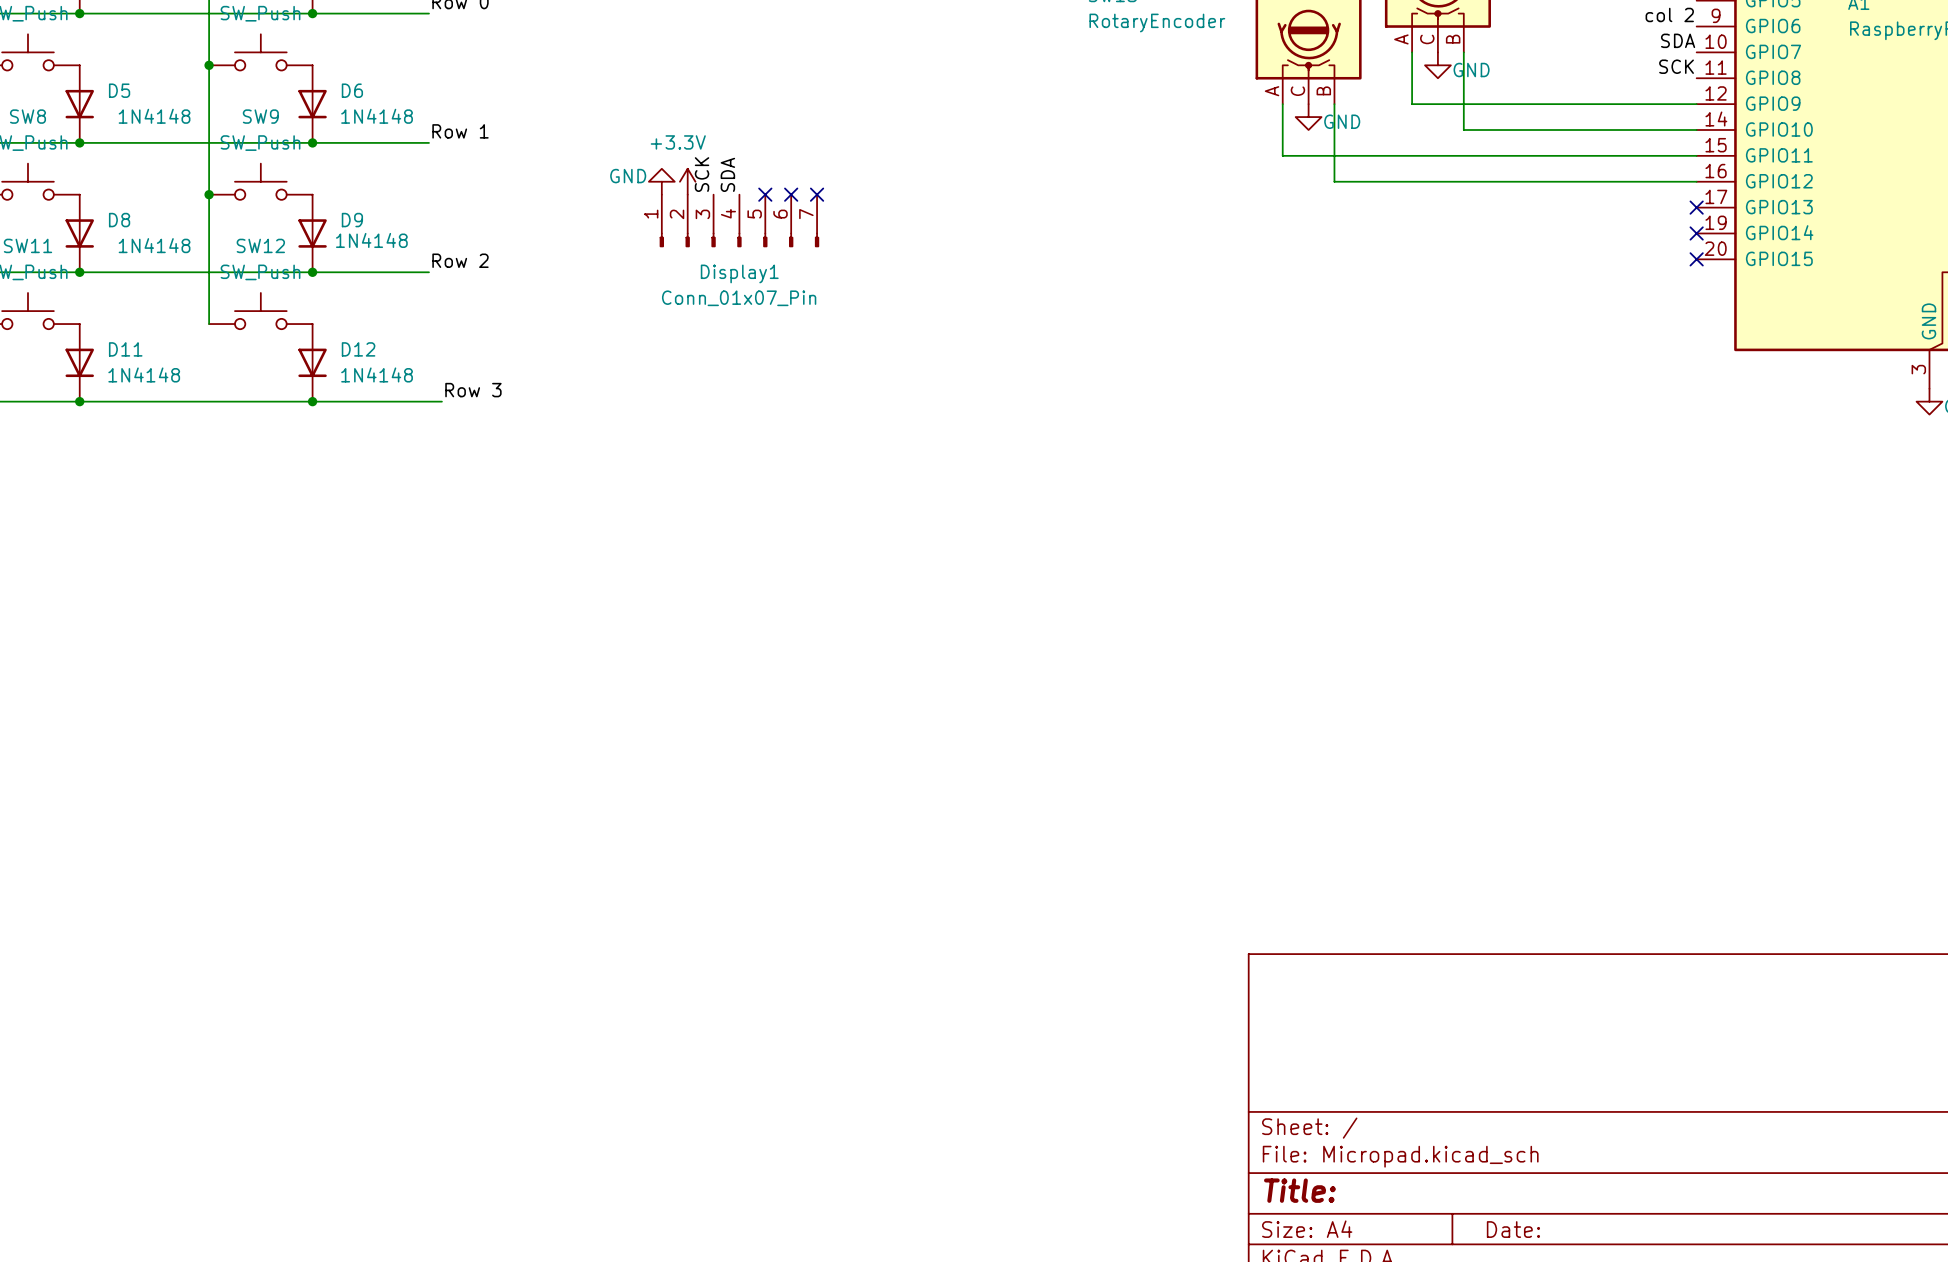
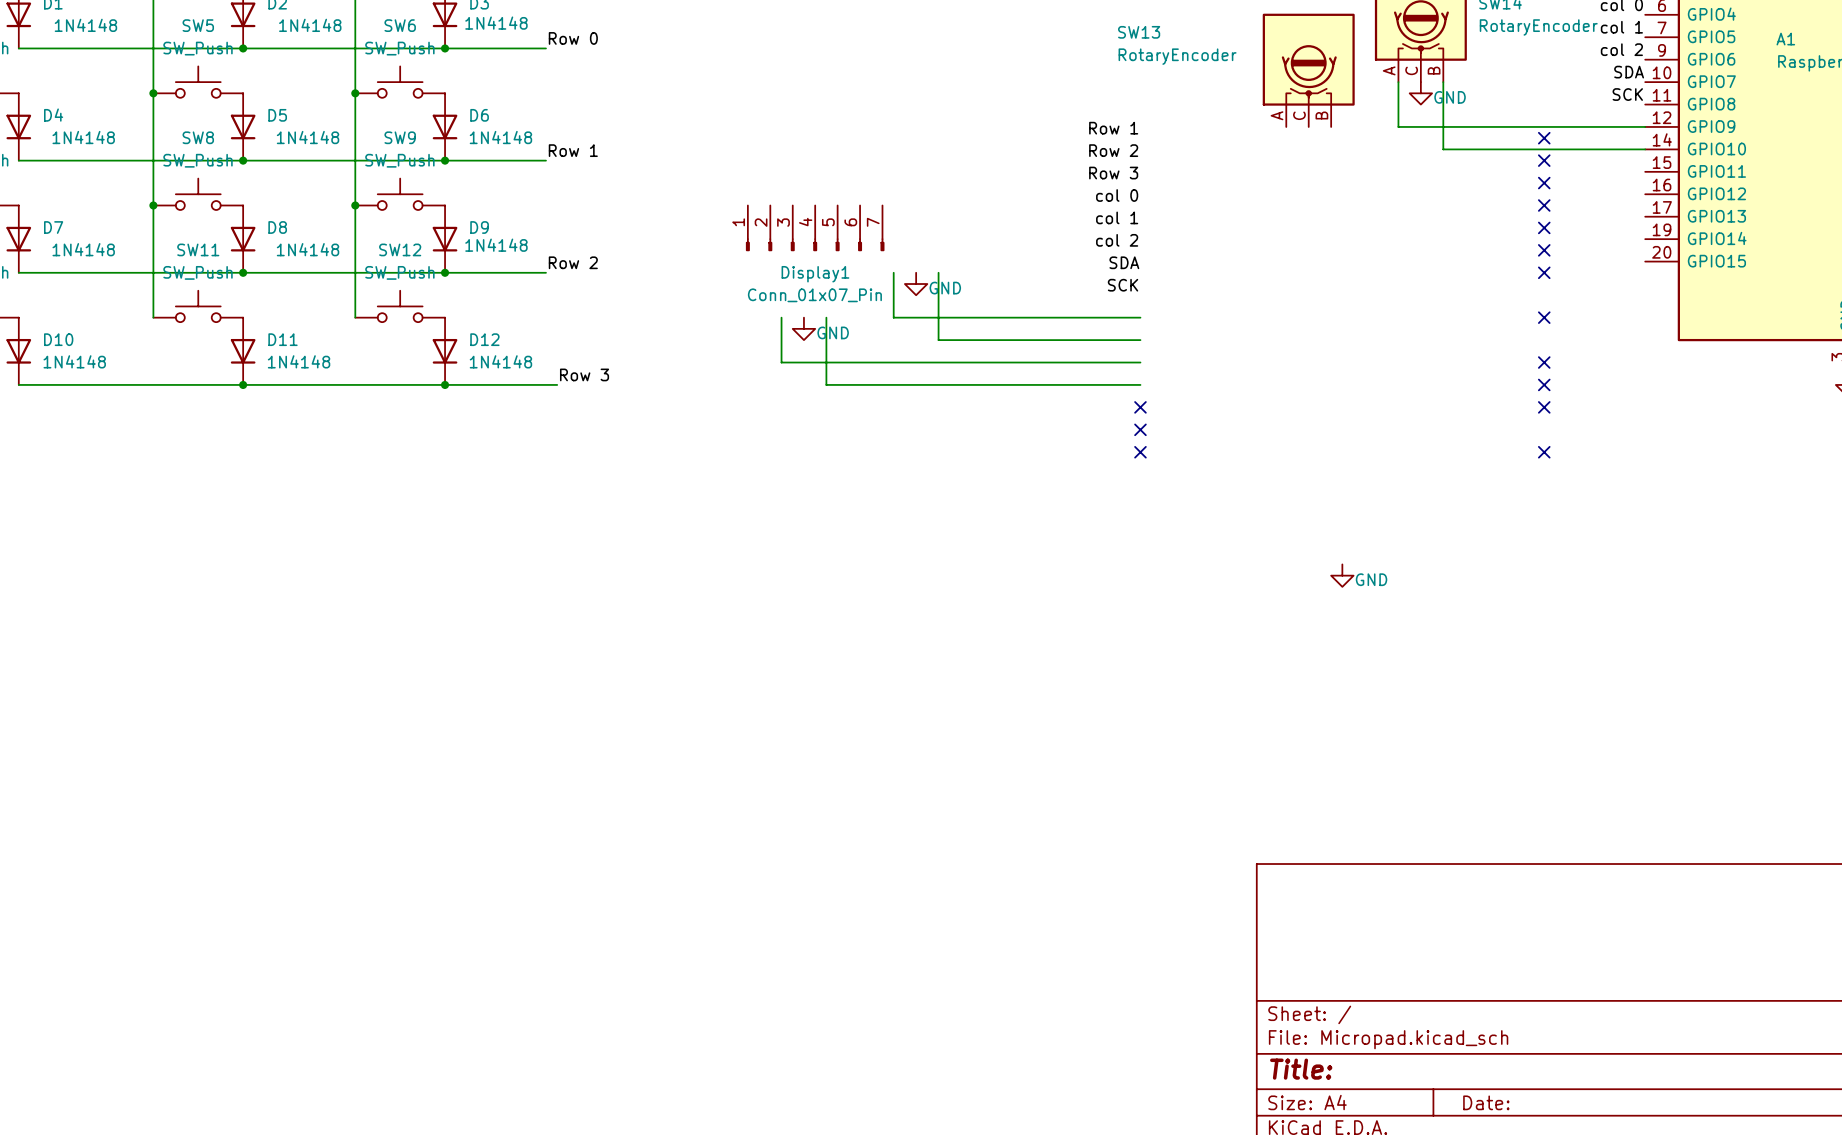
wire: (1282, 104) (1282, 155) (1696, 155) -> none
wire: (1334, 104) (1334, 181) (1696, 181) -> none
label: none -> Row 1 (1113, 128)
power symbol: GND (1308, 117) -> none
no-connect mark: none -> (1544, 138)
label: none -> Row 2 (1113, 150)
no-connect mark: none -> (1544, 160)
label: none -> Row 3 (1113, 173)
no-connect mark: none -> (1544, 183)
label: SCK (702, 174) -> none
label: SDA (727, 174) -> none
power symbol: GND (661, 181) -> none
power symbol: +3.3V (687, 181) -> none
label: none -> col 0 (1117, 195)
no-connect mark: (765, 194) -> none
no-connect mark: (791, 194) -> none
no-connect mark: (817, 194) -> none
no-connect mark: none -> (1544, 205)
no-connect mark: (1696, 207) -> none
label: none -> col 1 (1117, 217)
no-connect mark: none -> (1544, 227)
no-connect mark: (1696, 233) -> none
label: none -> col 2 (1117, 240)
no-connect mark: none -> (1544, 250)
no-connect mark: (1696, 259) -> none
label: none -> SDA (1124, 262)
wire: none -> (893, 272) (893, 317) (1140, 317)
wire: none -> (938, 272) (938, 340) (1140, 340)
no-connect mark: none -> (1544, 272)
power symbol: none -> GND (916, 284)
label: none -> SCK (1123, 285)
wire: none -> (781, 317) (781, 362) (1140, 362)
wire: none -> (826, 317) (826, 384) (1140, 384)
no-connect mark: none -> (1544, 317)
power symbol: none -> GND (803, 328)
no-connect mark: none -> (1544, 362)
no-connect mark: none -> (1544, 384)
no-connect mark: none -> (1140, 407)
no-connect mark: none -> (1544, 407)
no-connect mark: none -> (1140, 429)
no-connect mark: none -> (1140, 452)
no-connect mark: none -> (1544, 452)
power symbol: none -> GND (1342, 575)

